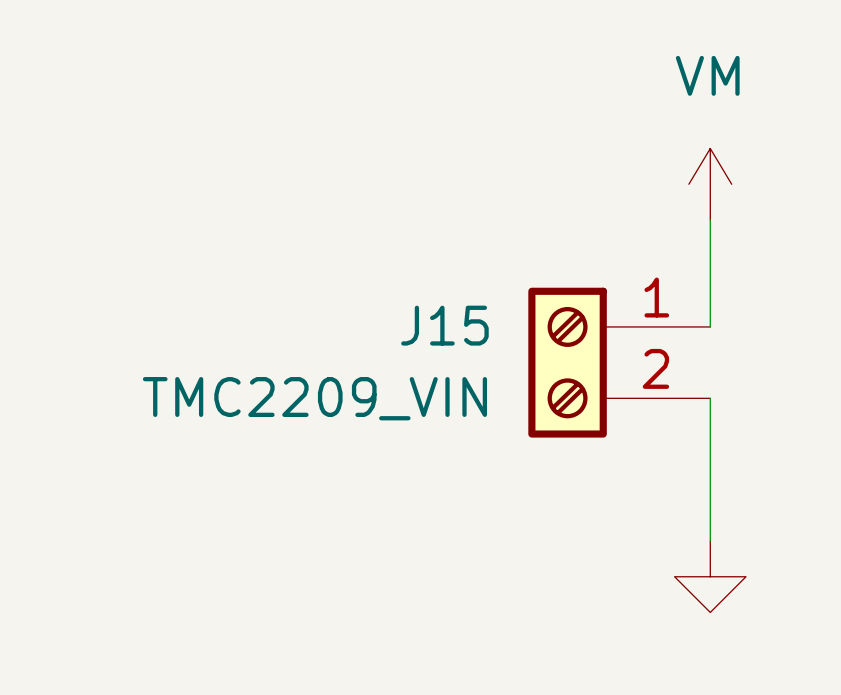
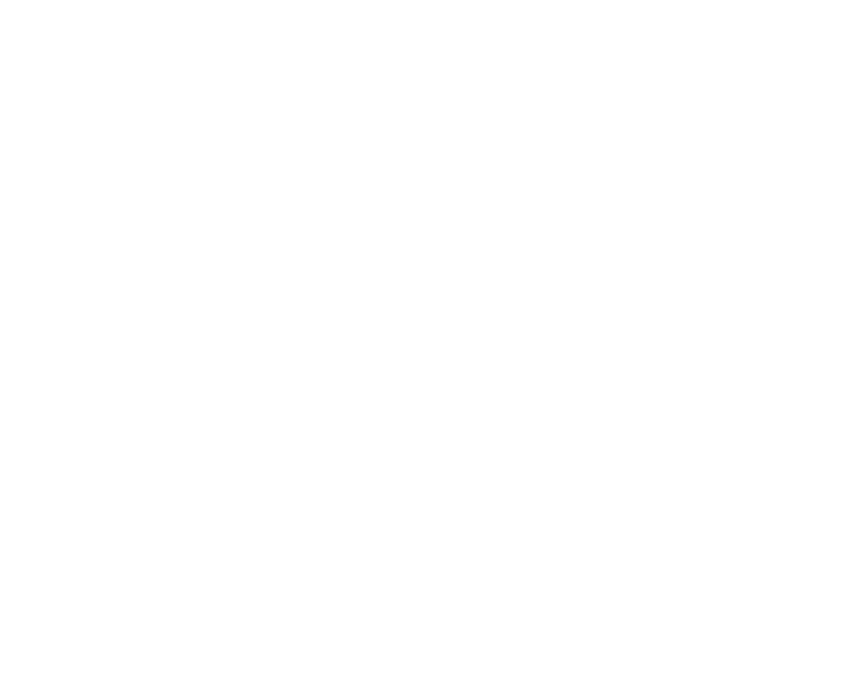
power symbol: VM (710, 184) -> none
wire: (710, 219) (710, 326) -> none
J15: TMC2209_VIN (619, 362) -> none
wire: (710, 398) (710, 541) -> none
power symbol: (710, 576) -> none

